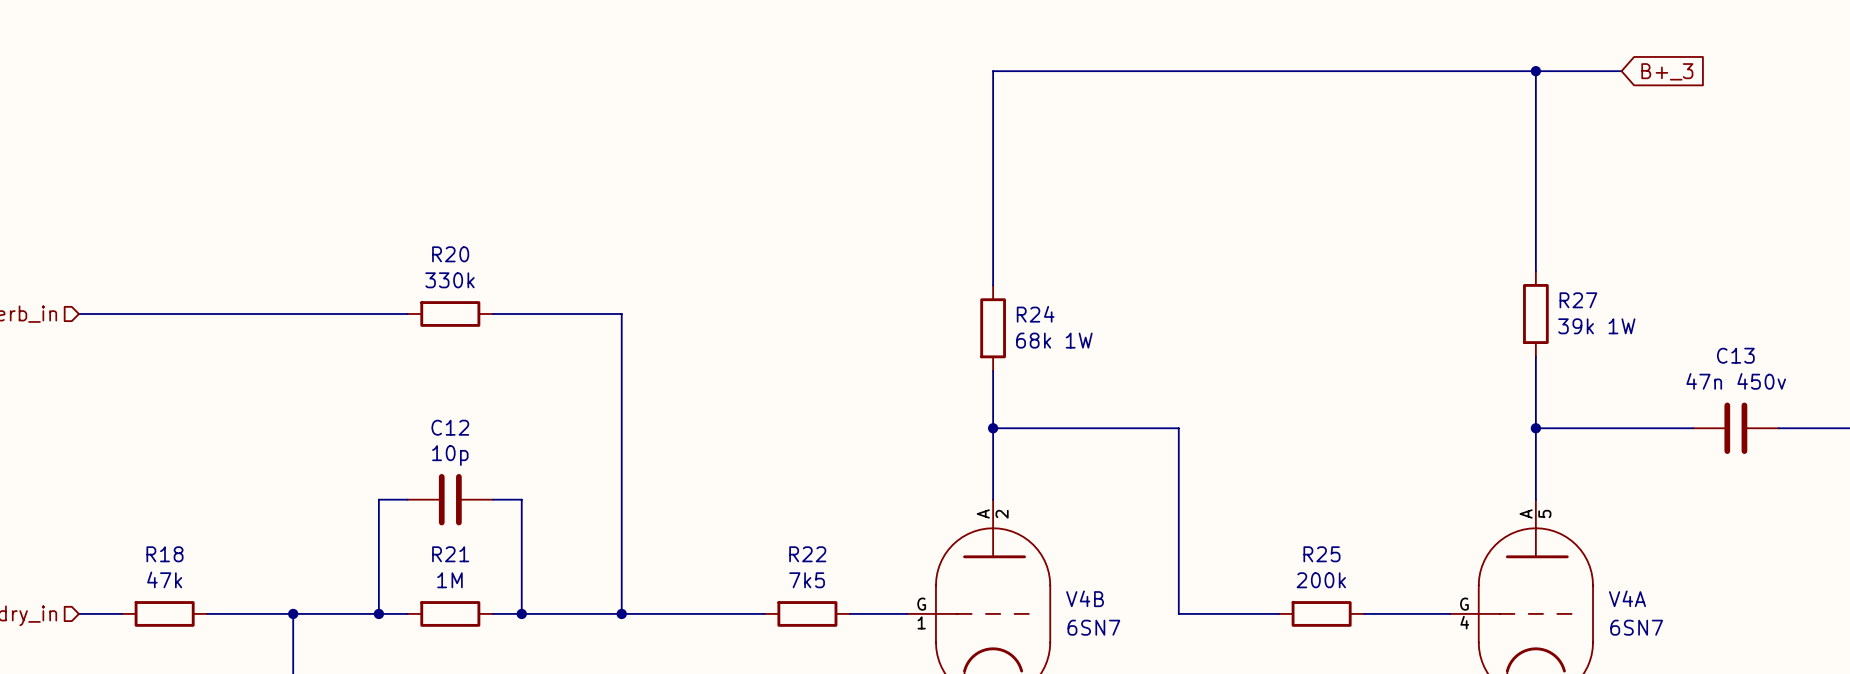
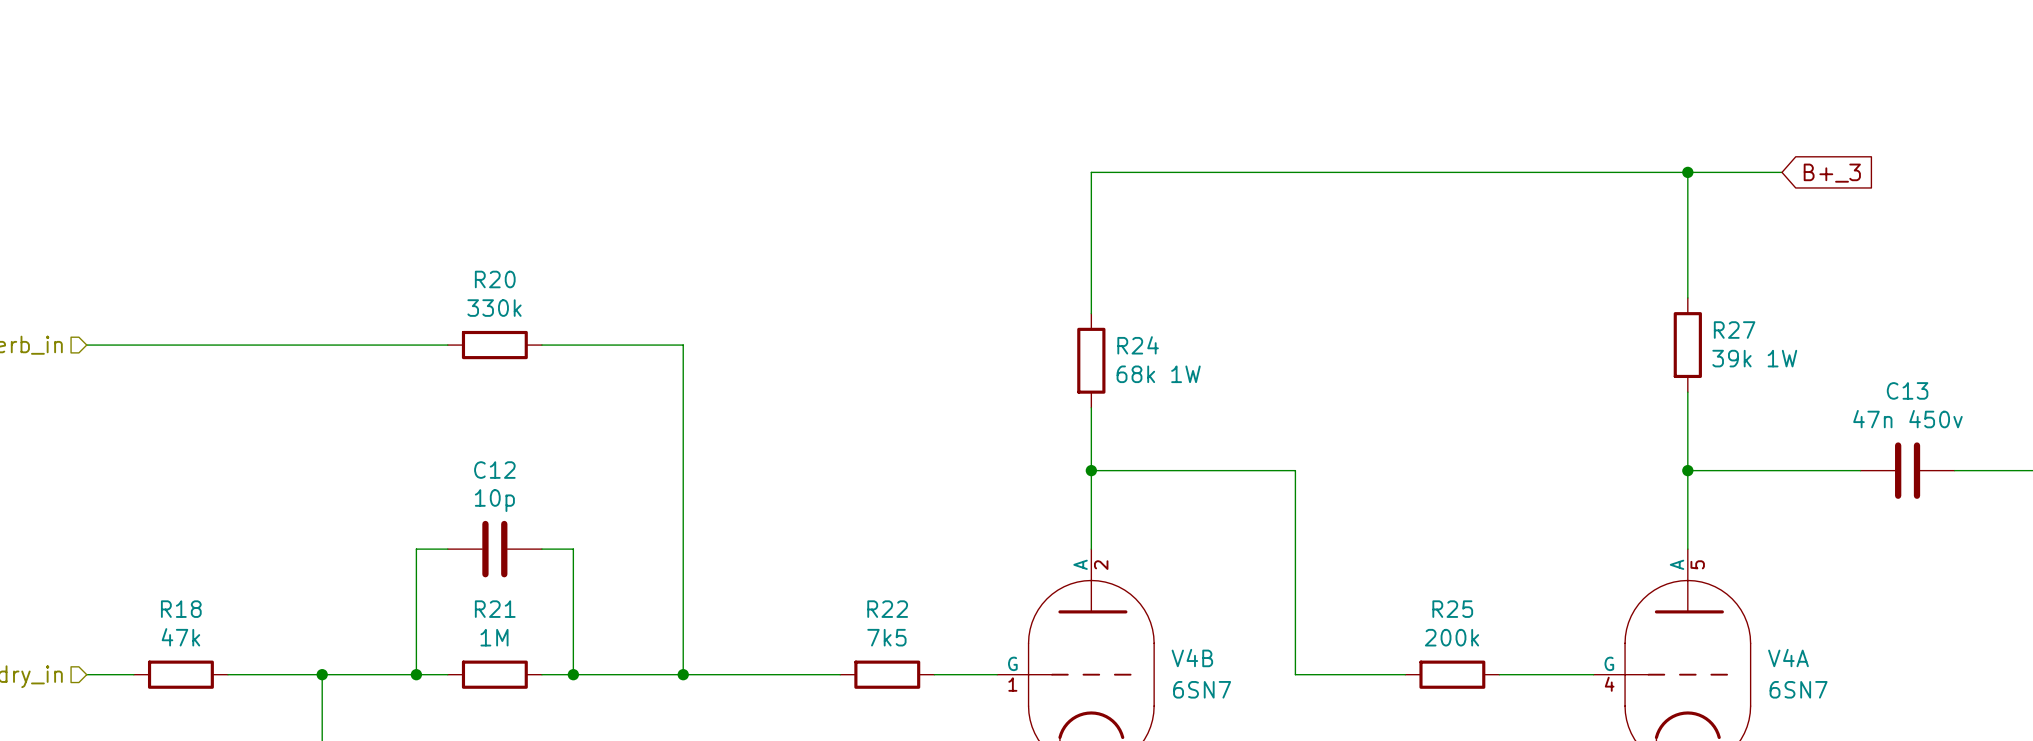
wire: (1535, 71) (1535, 156) -> none
junction: (1535, 71) -> none
wire: (1621, 71) (993, 71) (993, 156) -> (1782, 172) (1091, 172)
global label position: B+_3 (1667, 71) -> B+_3 (1832, 173)
junction: none -> (1687, 172)

